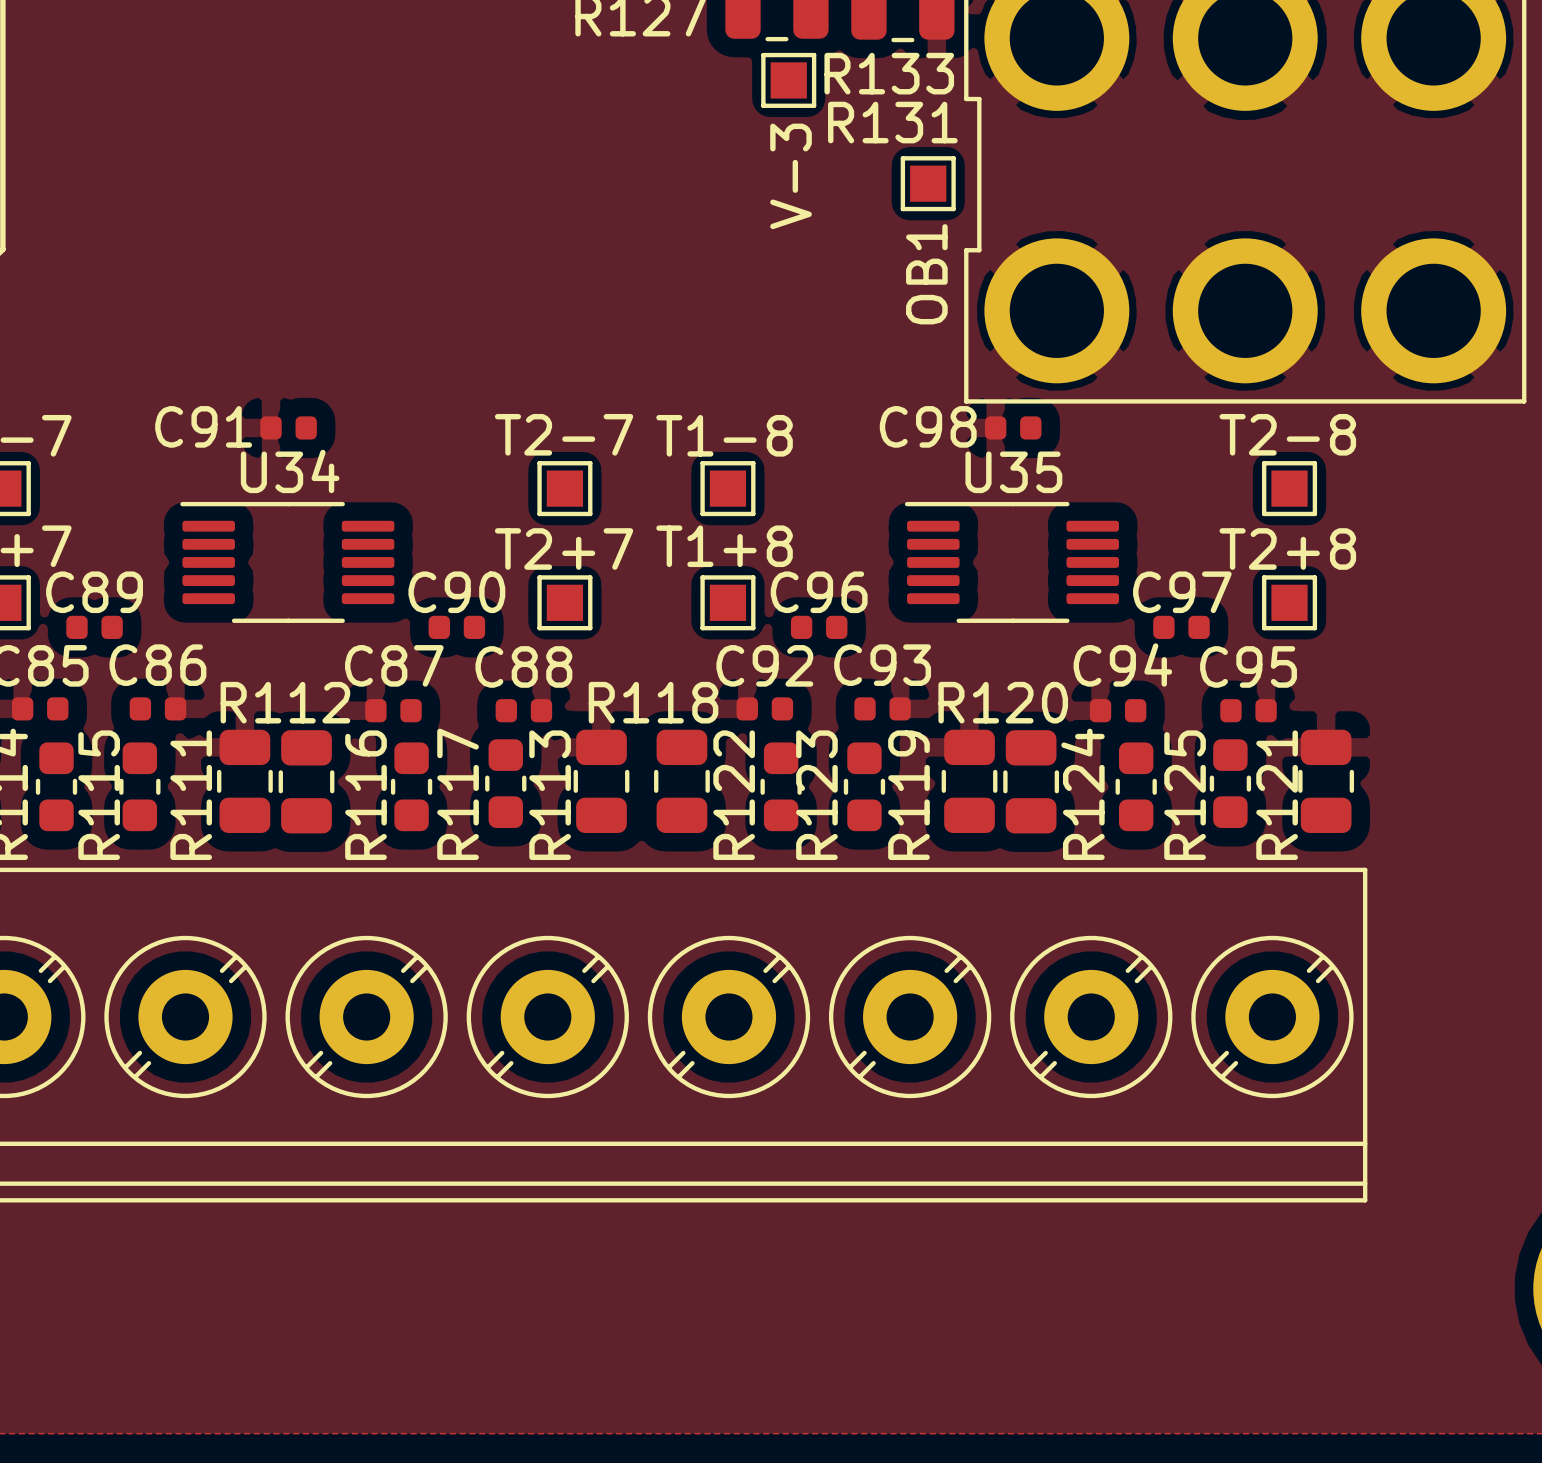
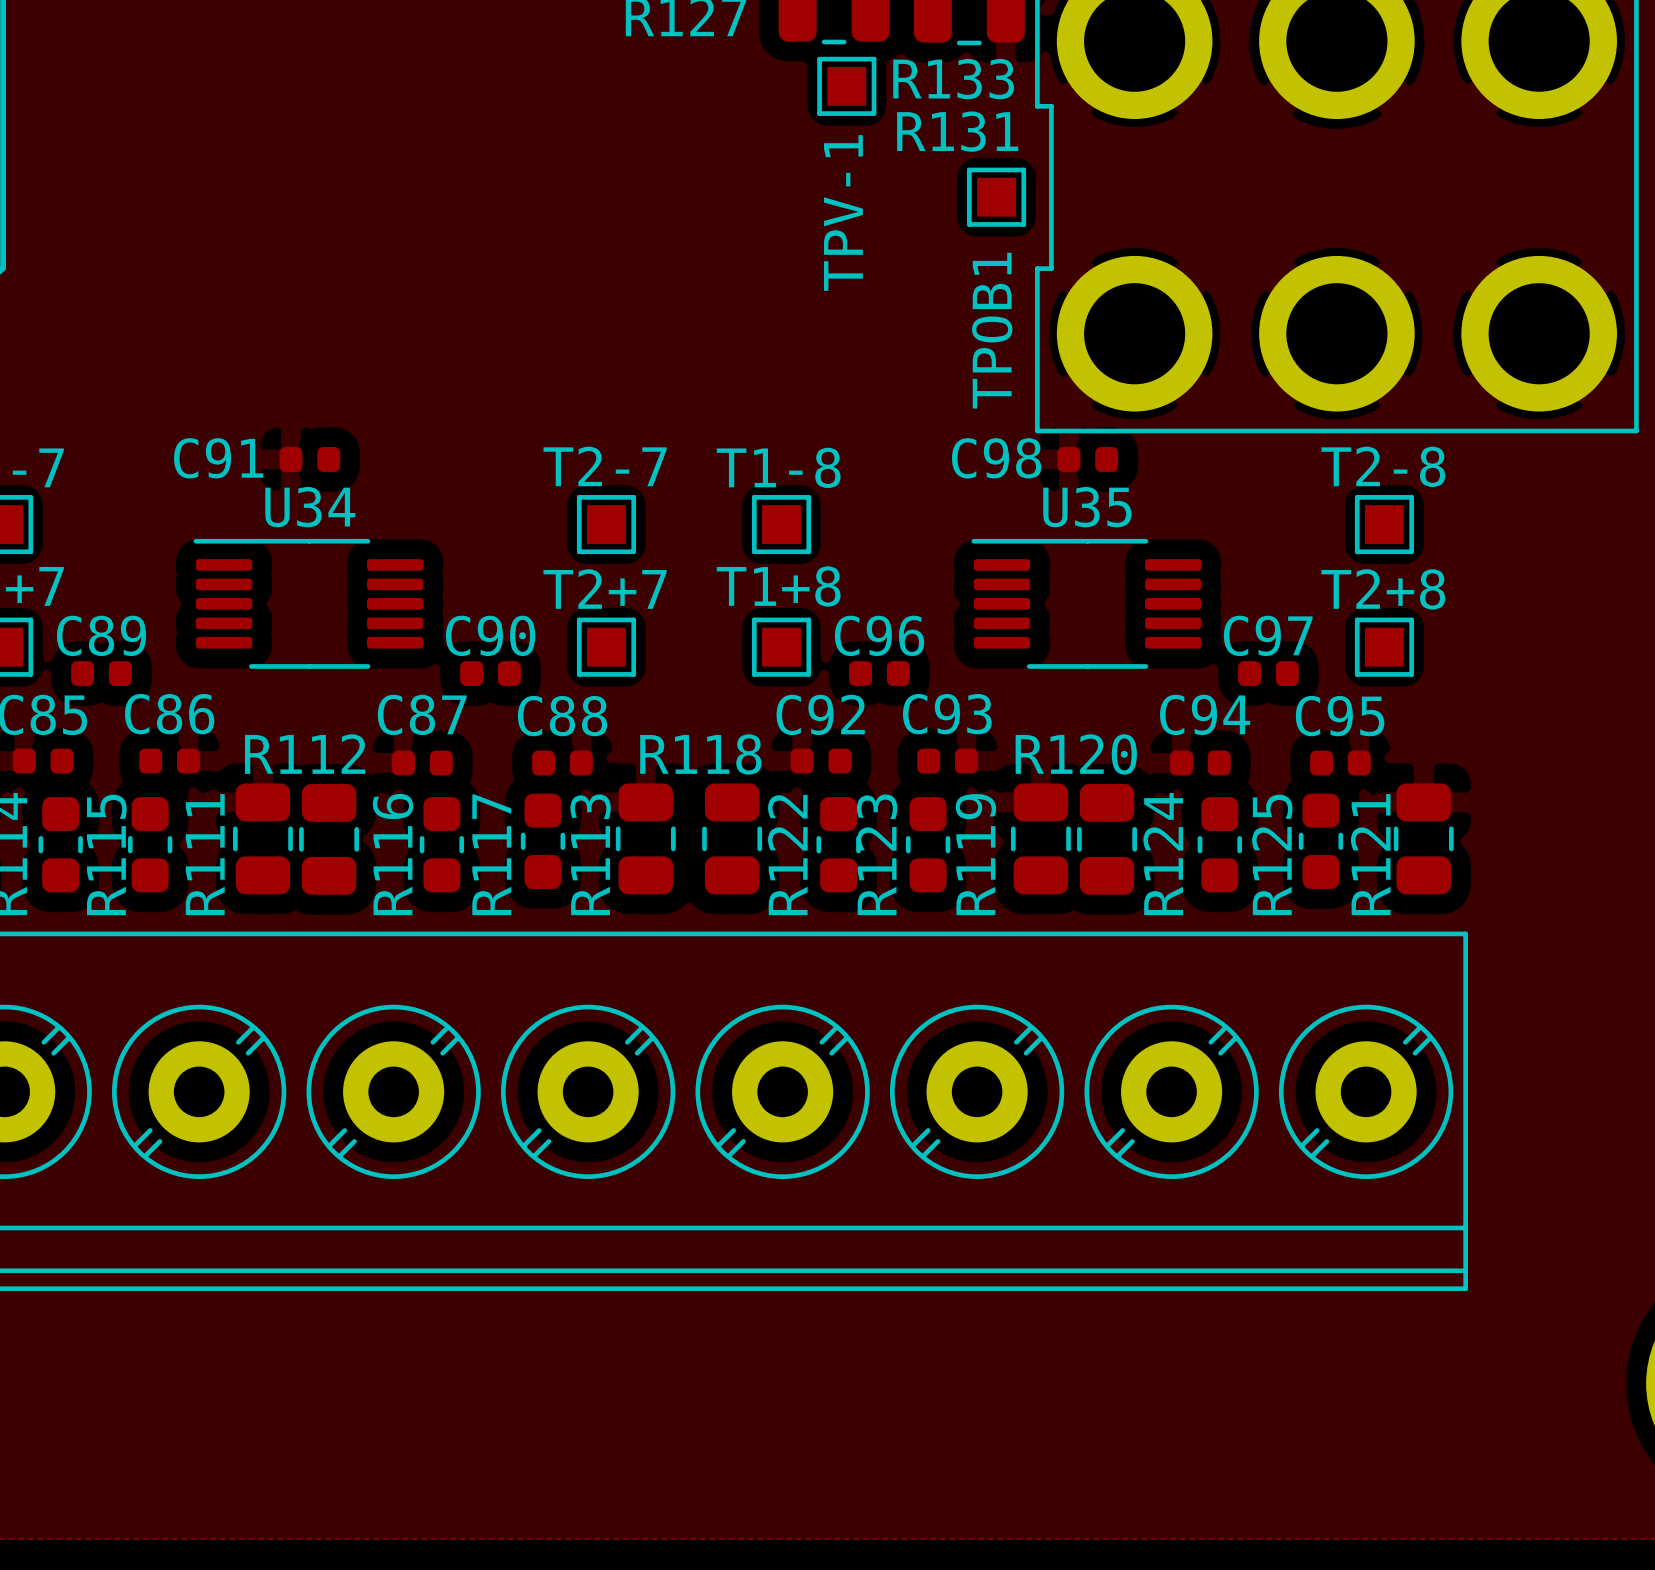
V-3 name: V-3 (791, 176) -> TPV-1 (843, 212)
OB1 name: OB1 (926, 274) -> TPOB1 (992, 330)

